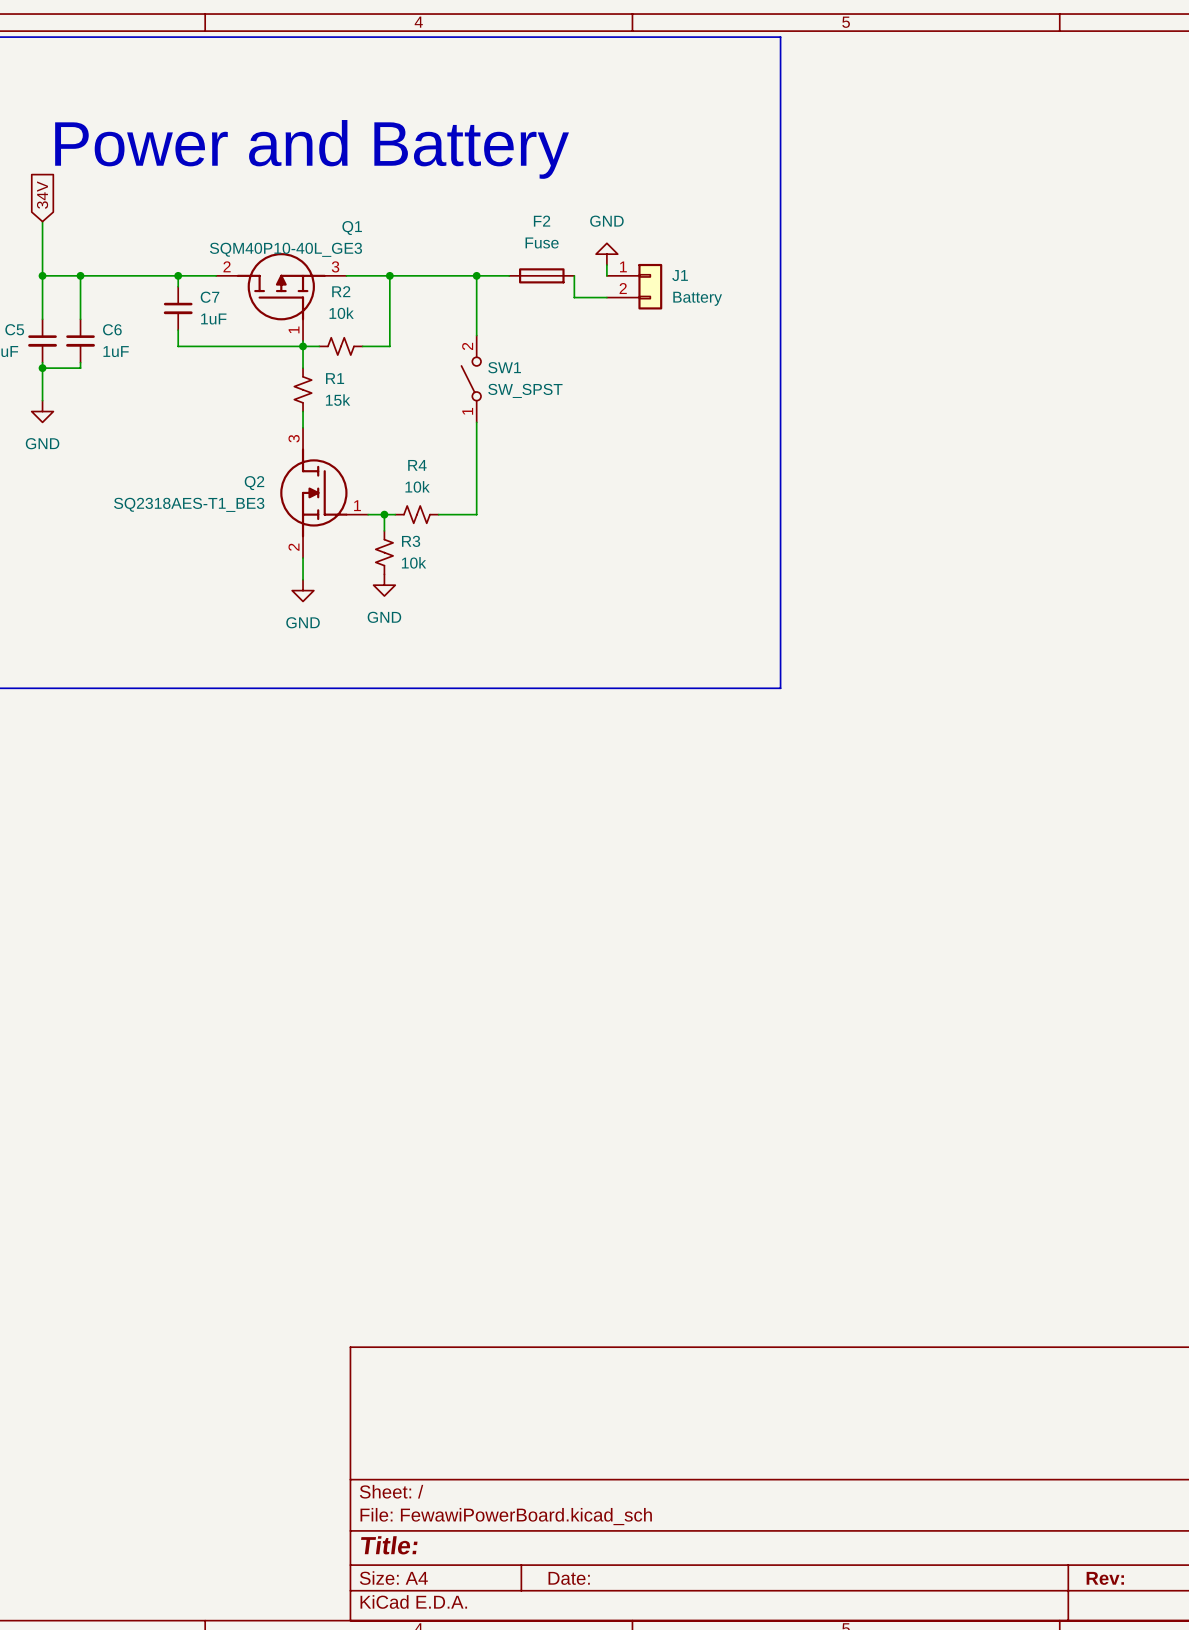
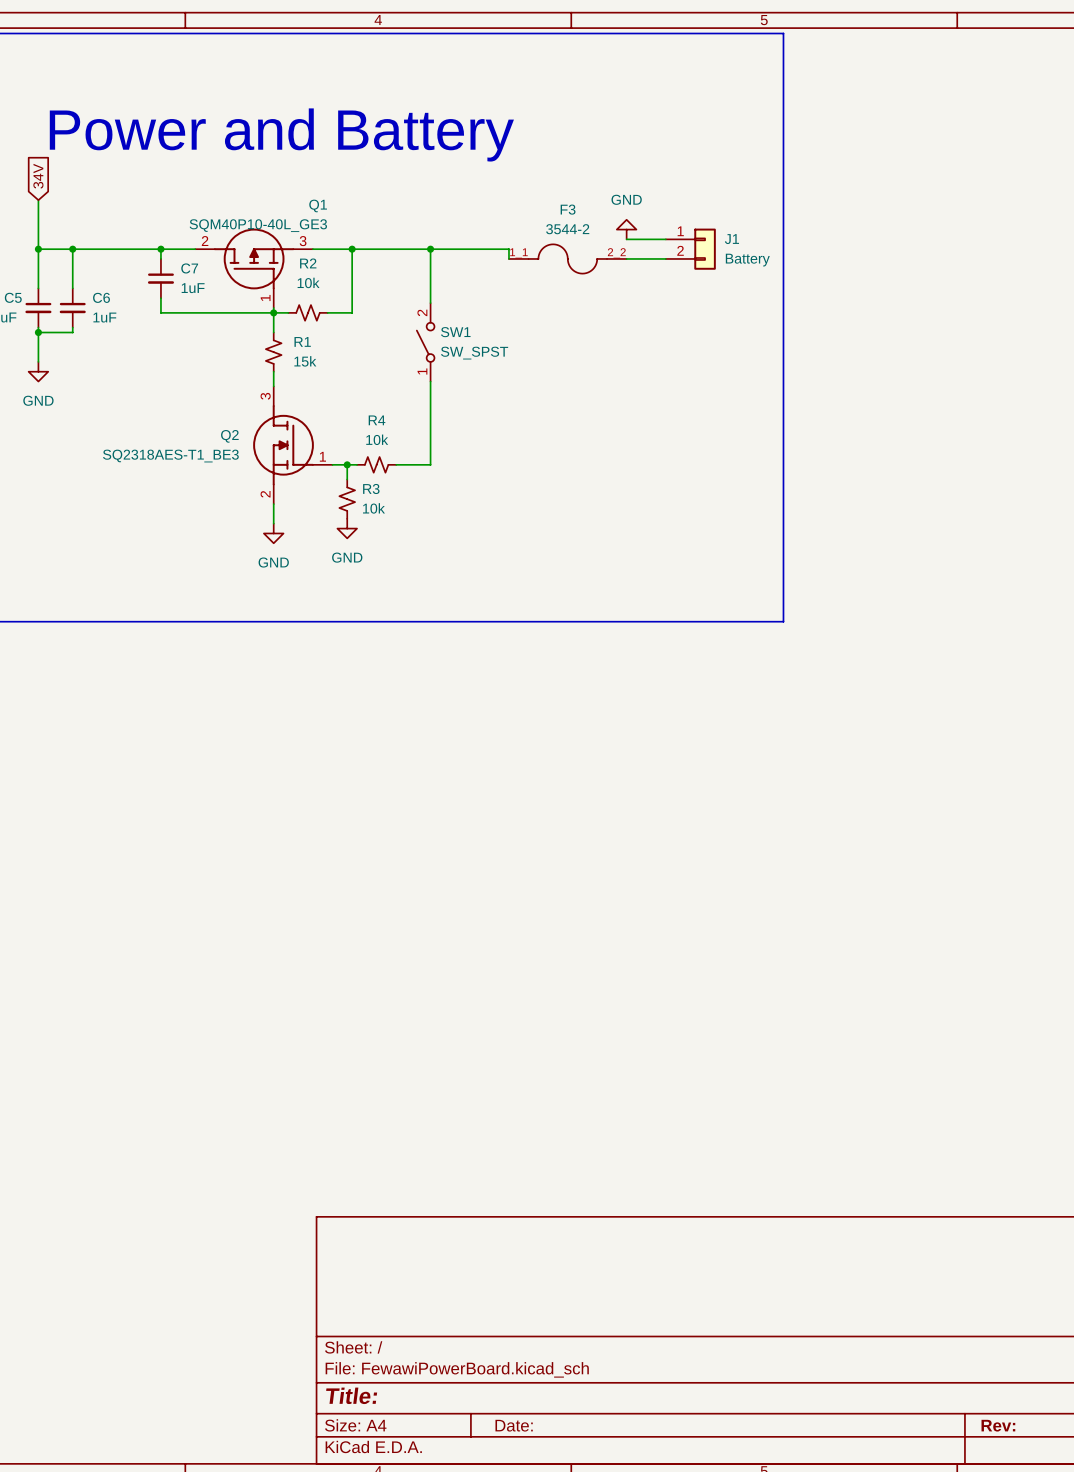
line: (780, 37) (780, 688) -> (705, 33) (783, 33) (783, 621) (705, 621)
power symbol position: GND (606, 254) -> GND (626, 229)
wire: (606, 265) (606, 275) -> none
wire: none -> (626, 239) (665, 239)
F2: Fuse (541, 275) -> none
wire: (574, 275) (574, 297) (606, 297) -> none
F3: none -> 3544-2 (567, 258)
J1 position: (634, 286) -> (690, 249)
wire: none -> (626, 258) (665, 258)

